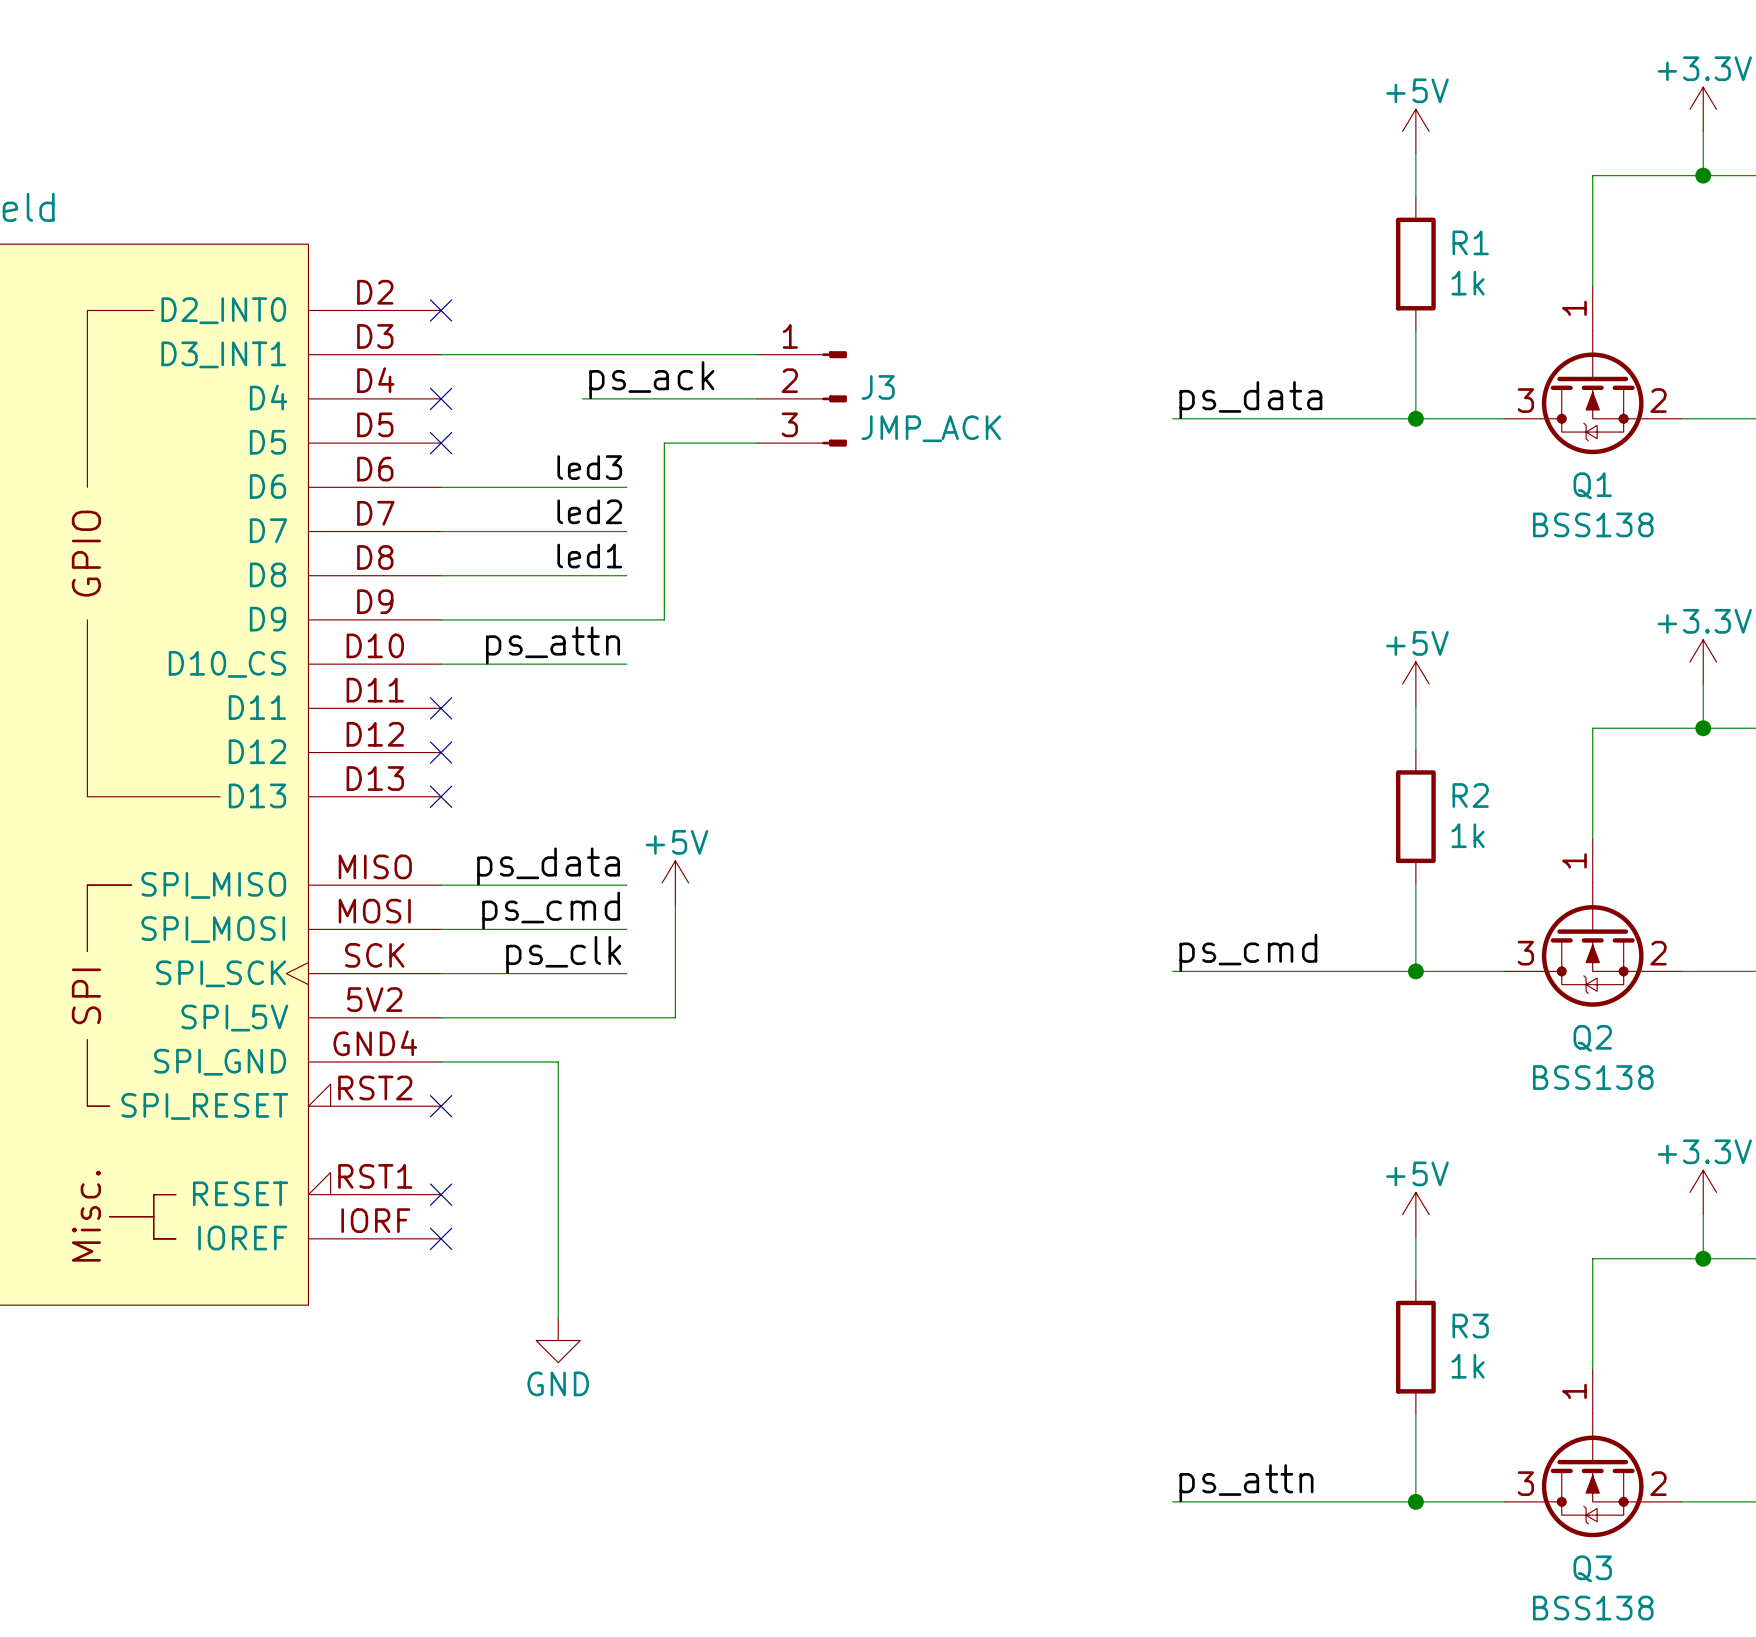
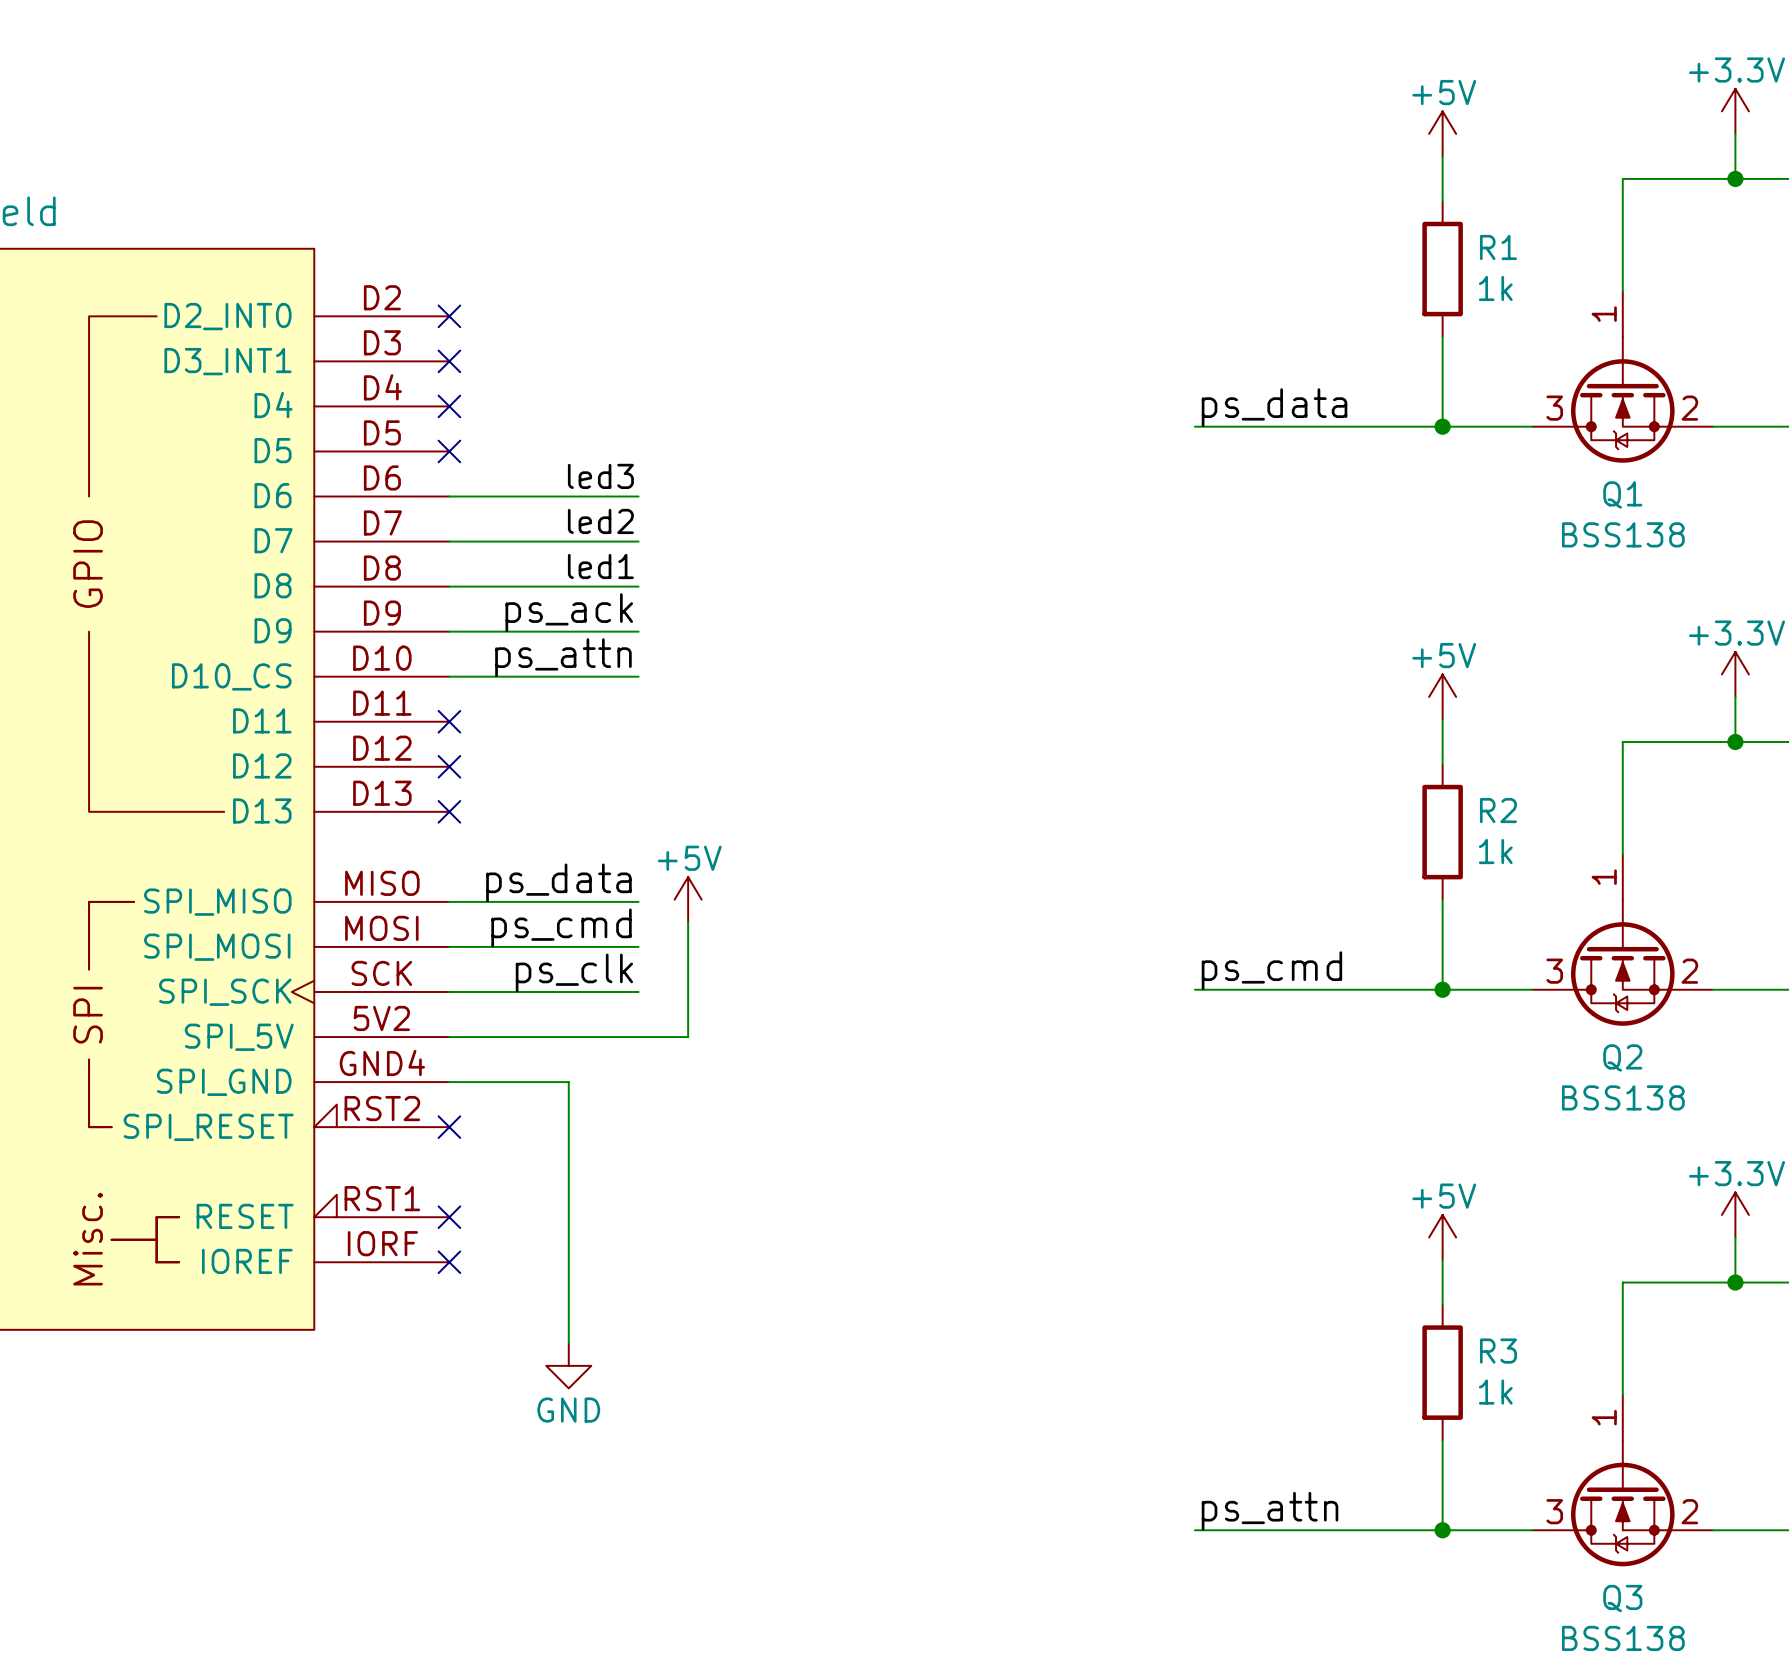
wire: (441, 354) (757, 354) -> none
no-connect mark: none -> (449, 361)
label position: ps_ack (651, 380) -> ps_ack (569, 612)
wire: (582, 398) (757, 398) -> none
J3: JMP_ACK (802, 398) -> none
wire: (757, 443) (664, 443) (664, 619) (626, 619) -> none

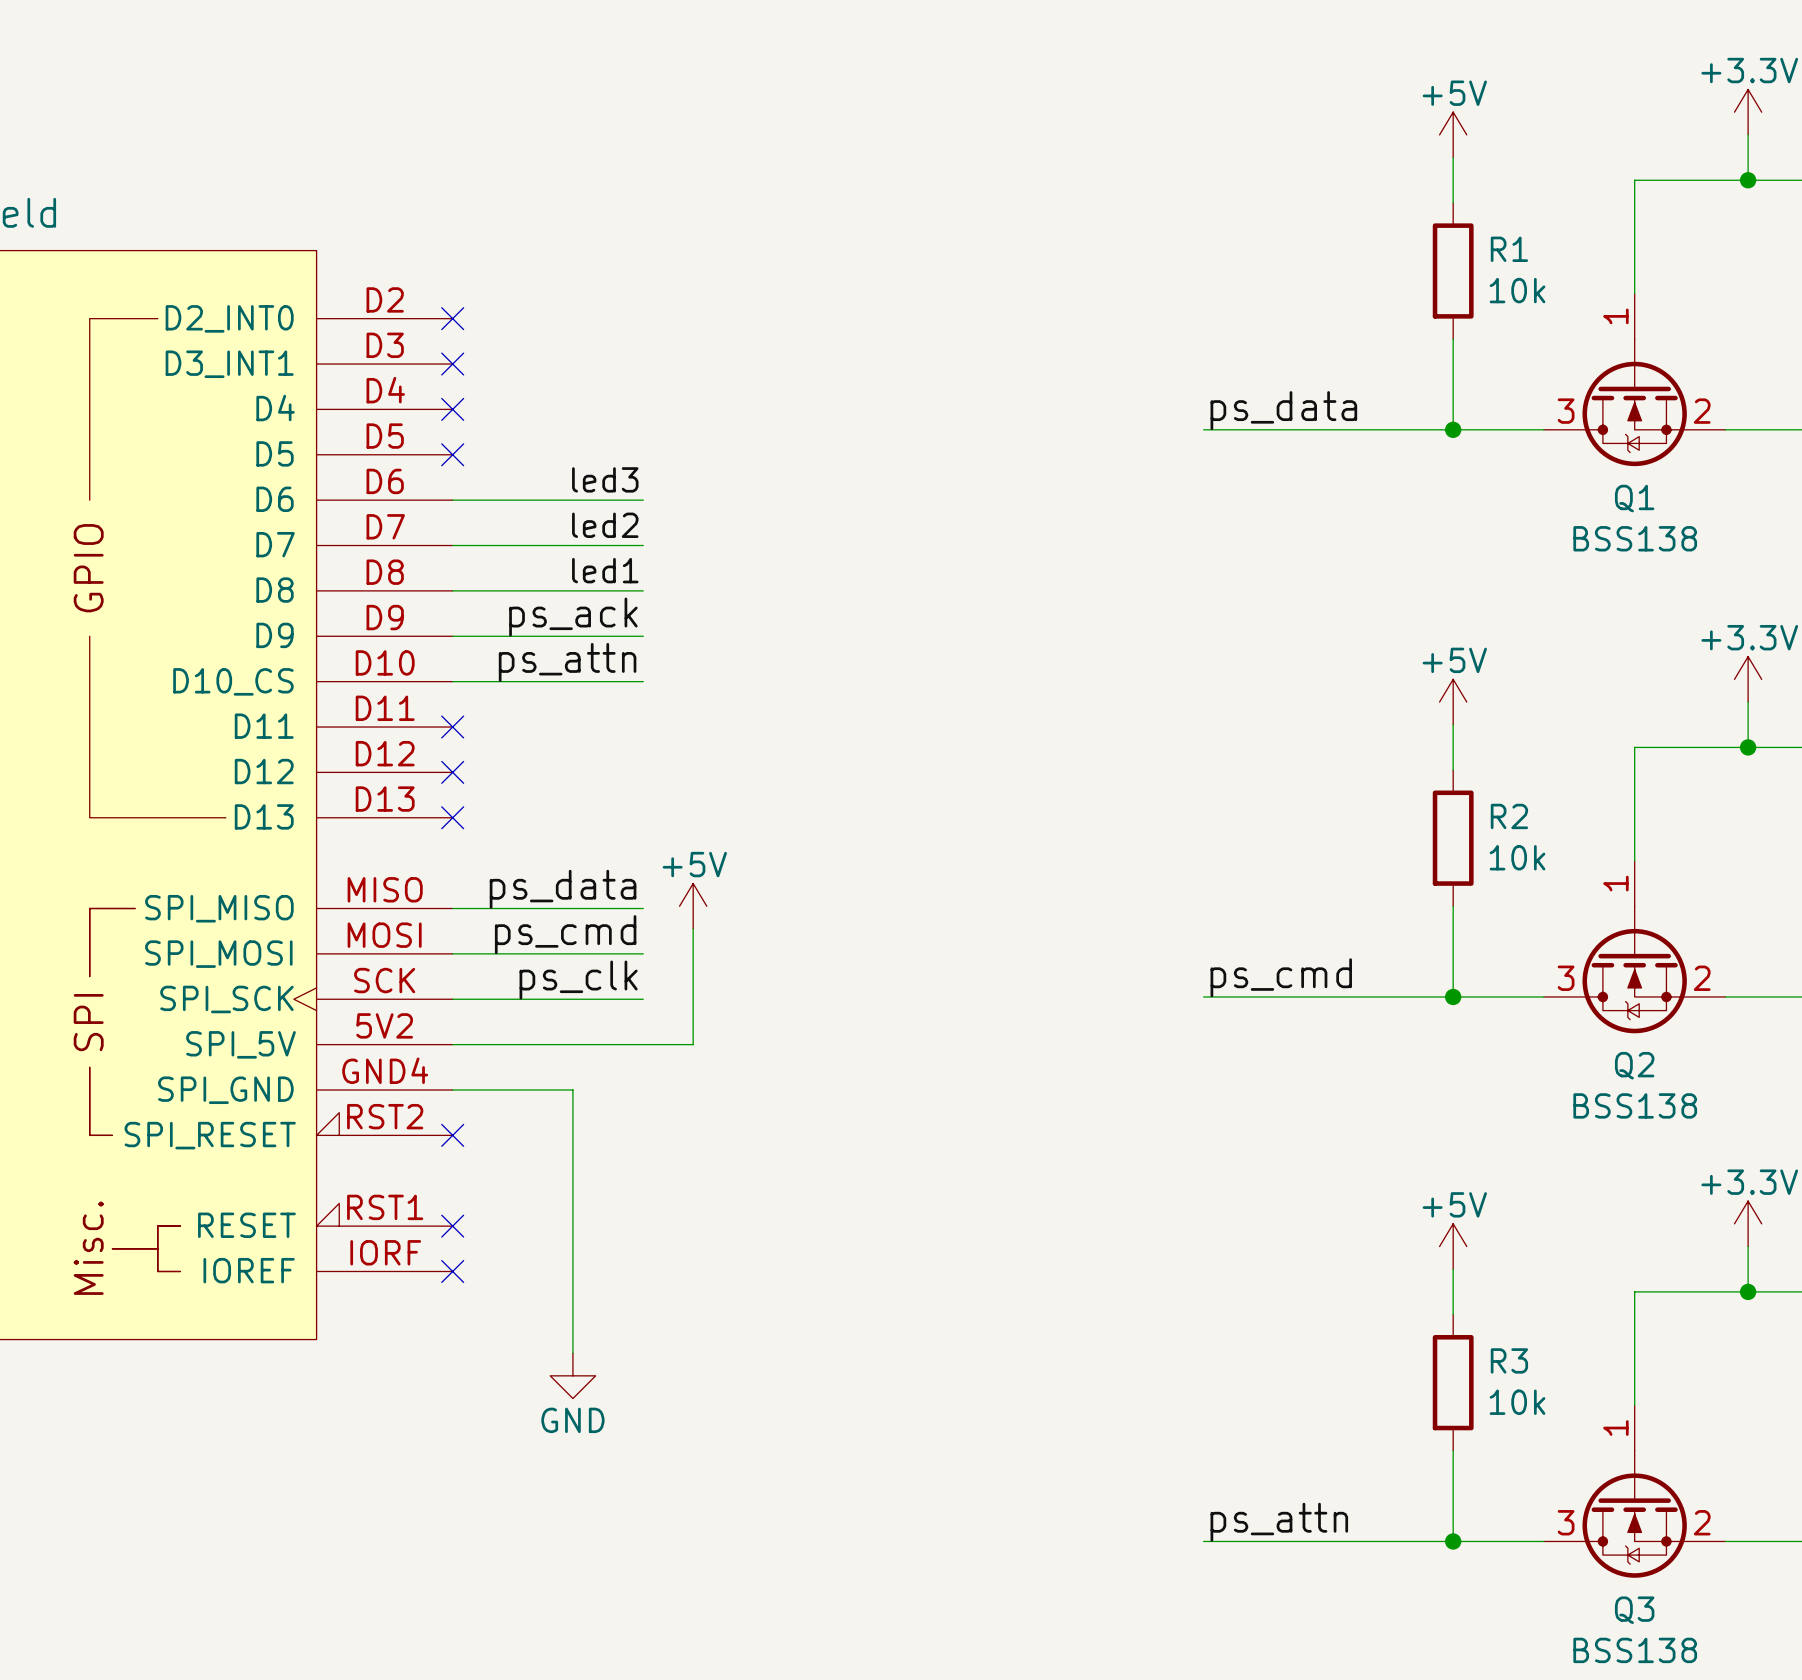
R1 value: 1k (1495, 288) -> 10k (1517, 290)
R2 value: 1k (1495, 851) -> 10k (1517, 857)
R3 value: 1k (1495, 1392) -> 10k (1517, 1402)

